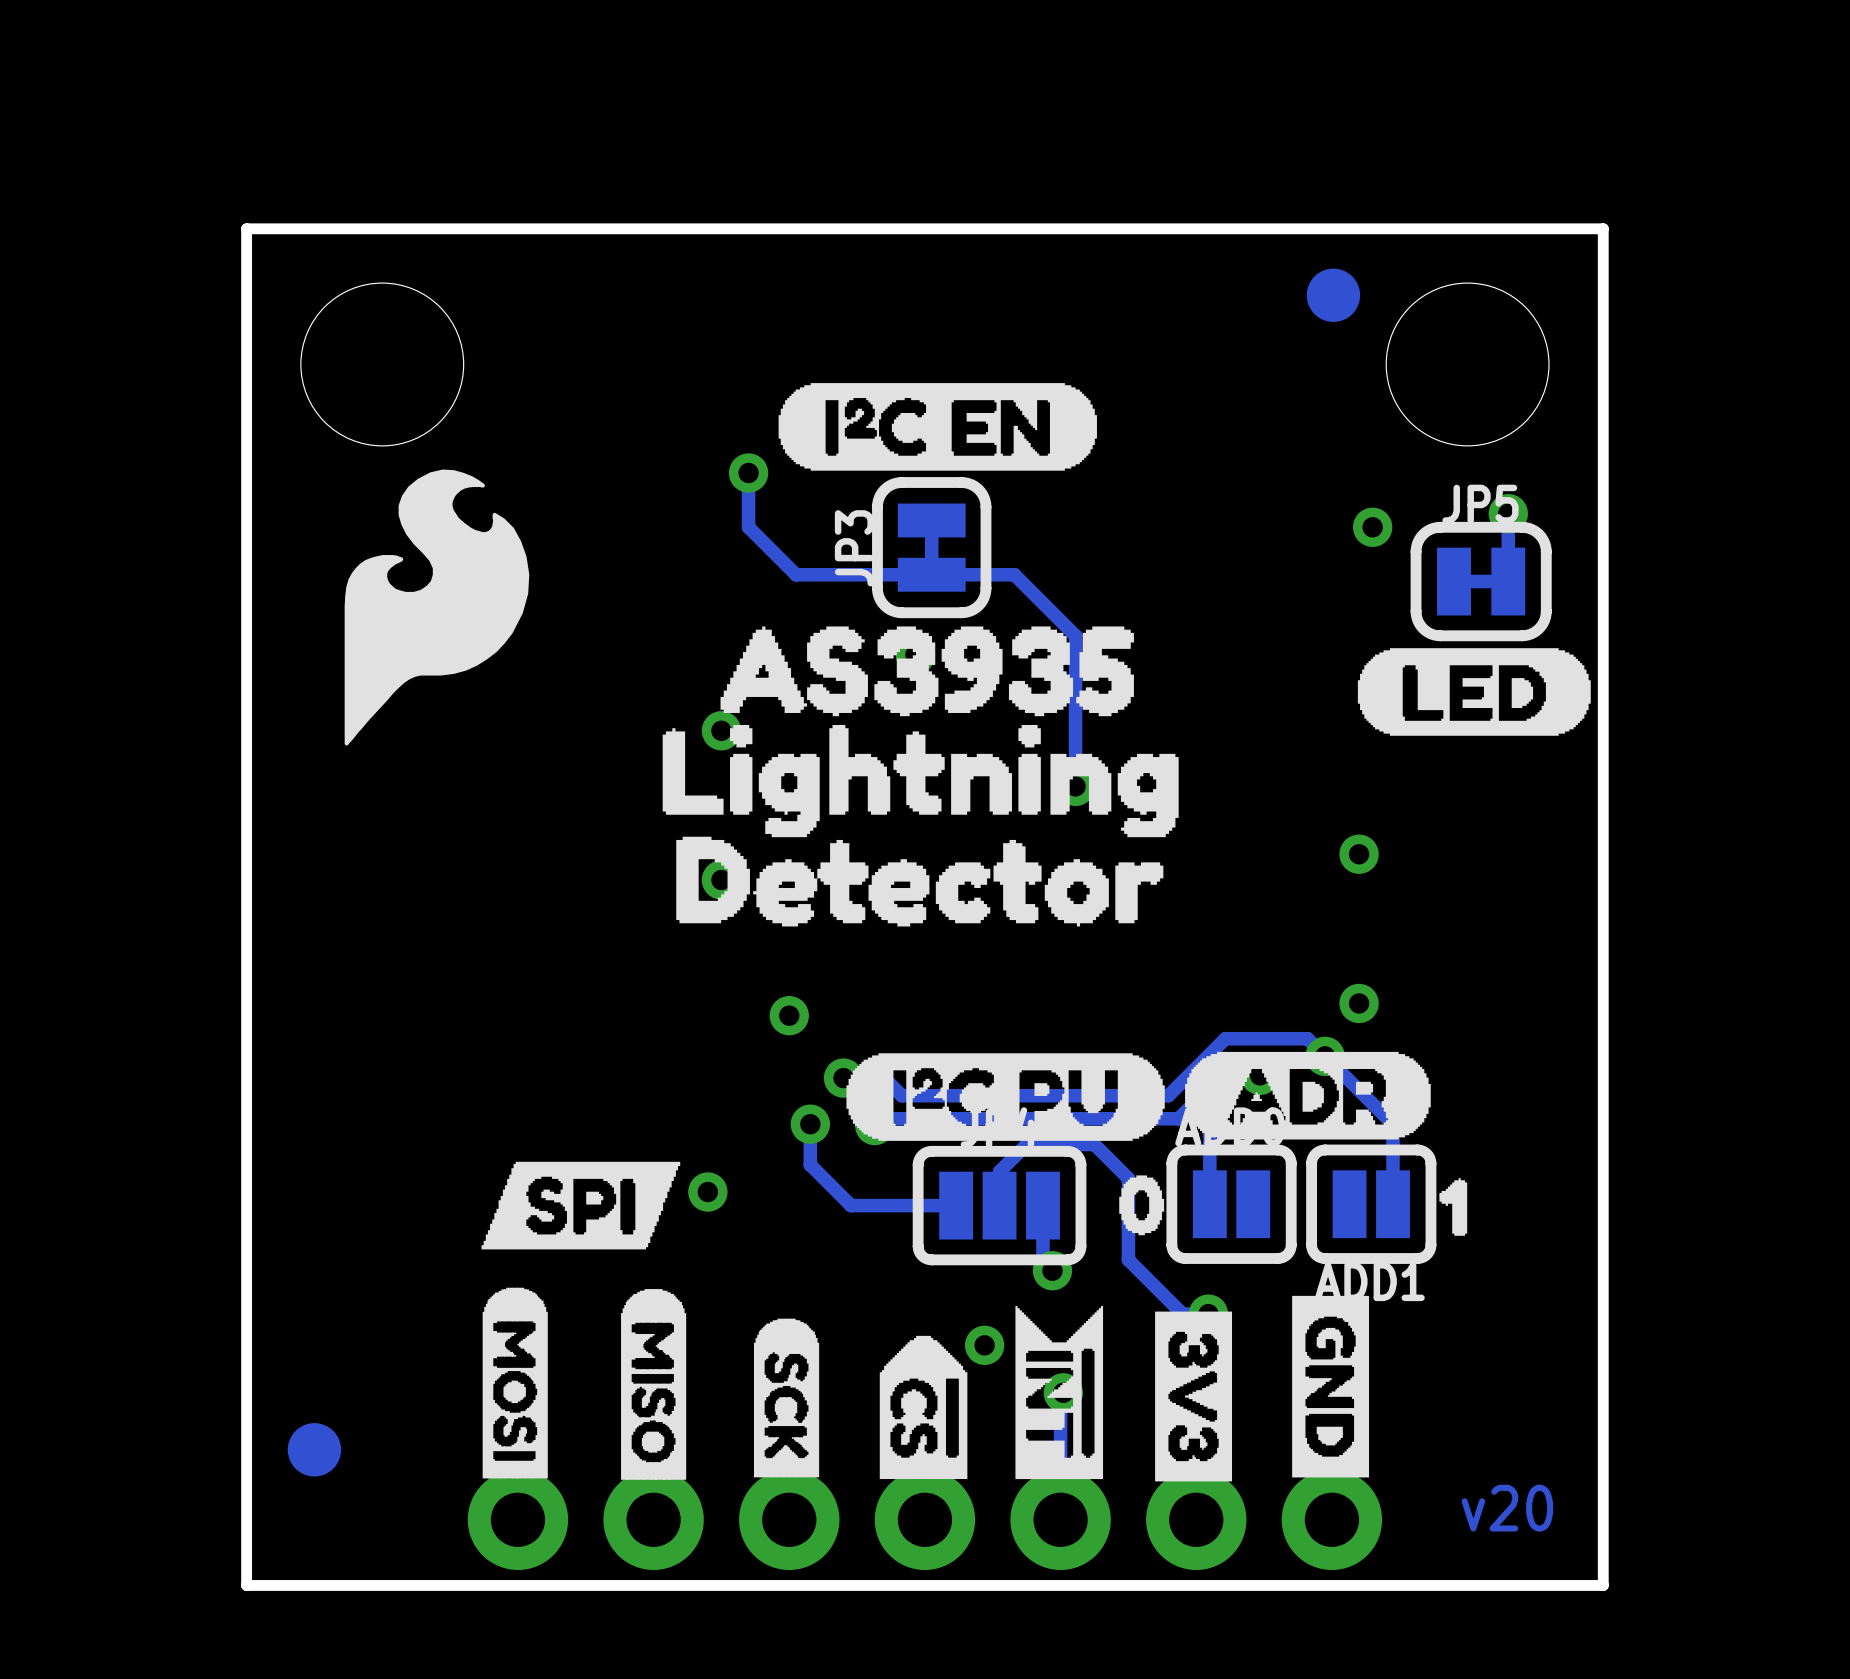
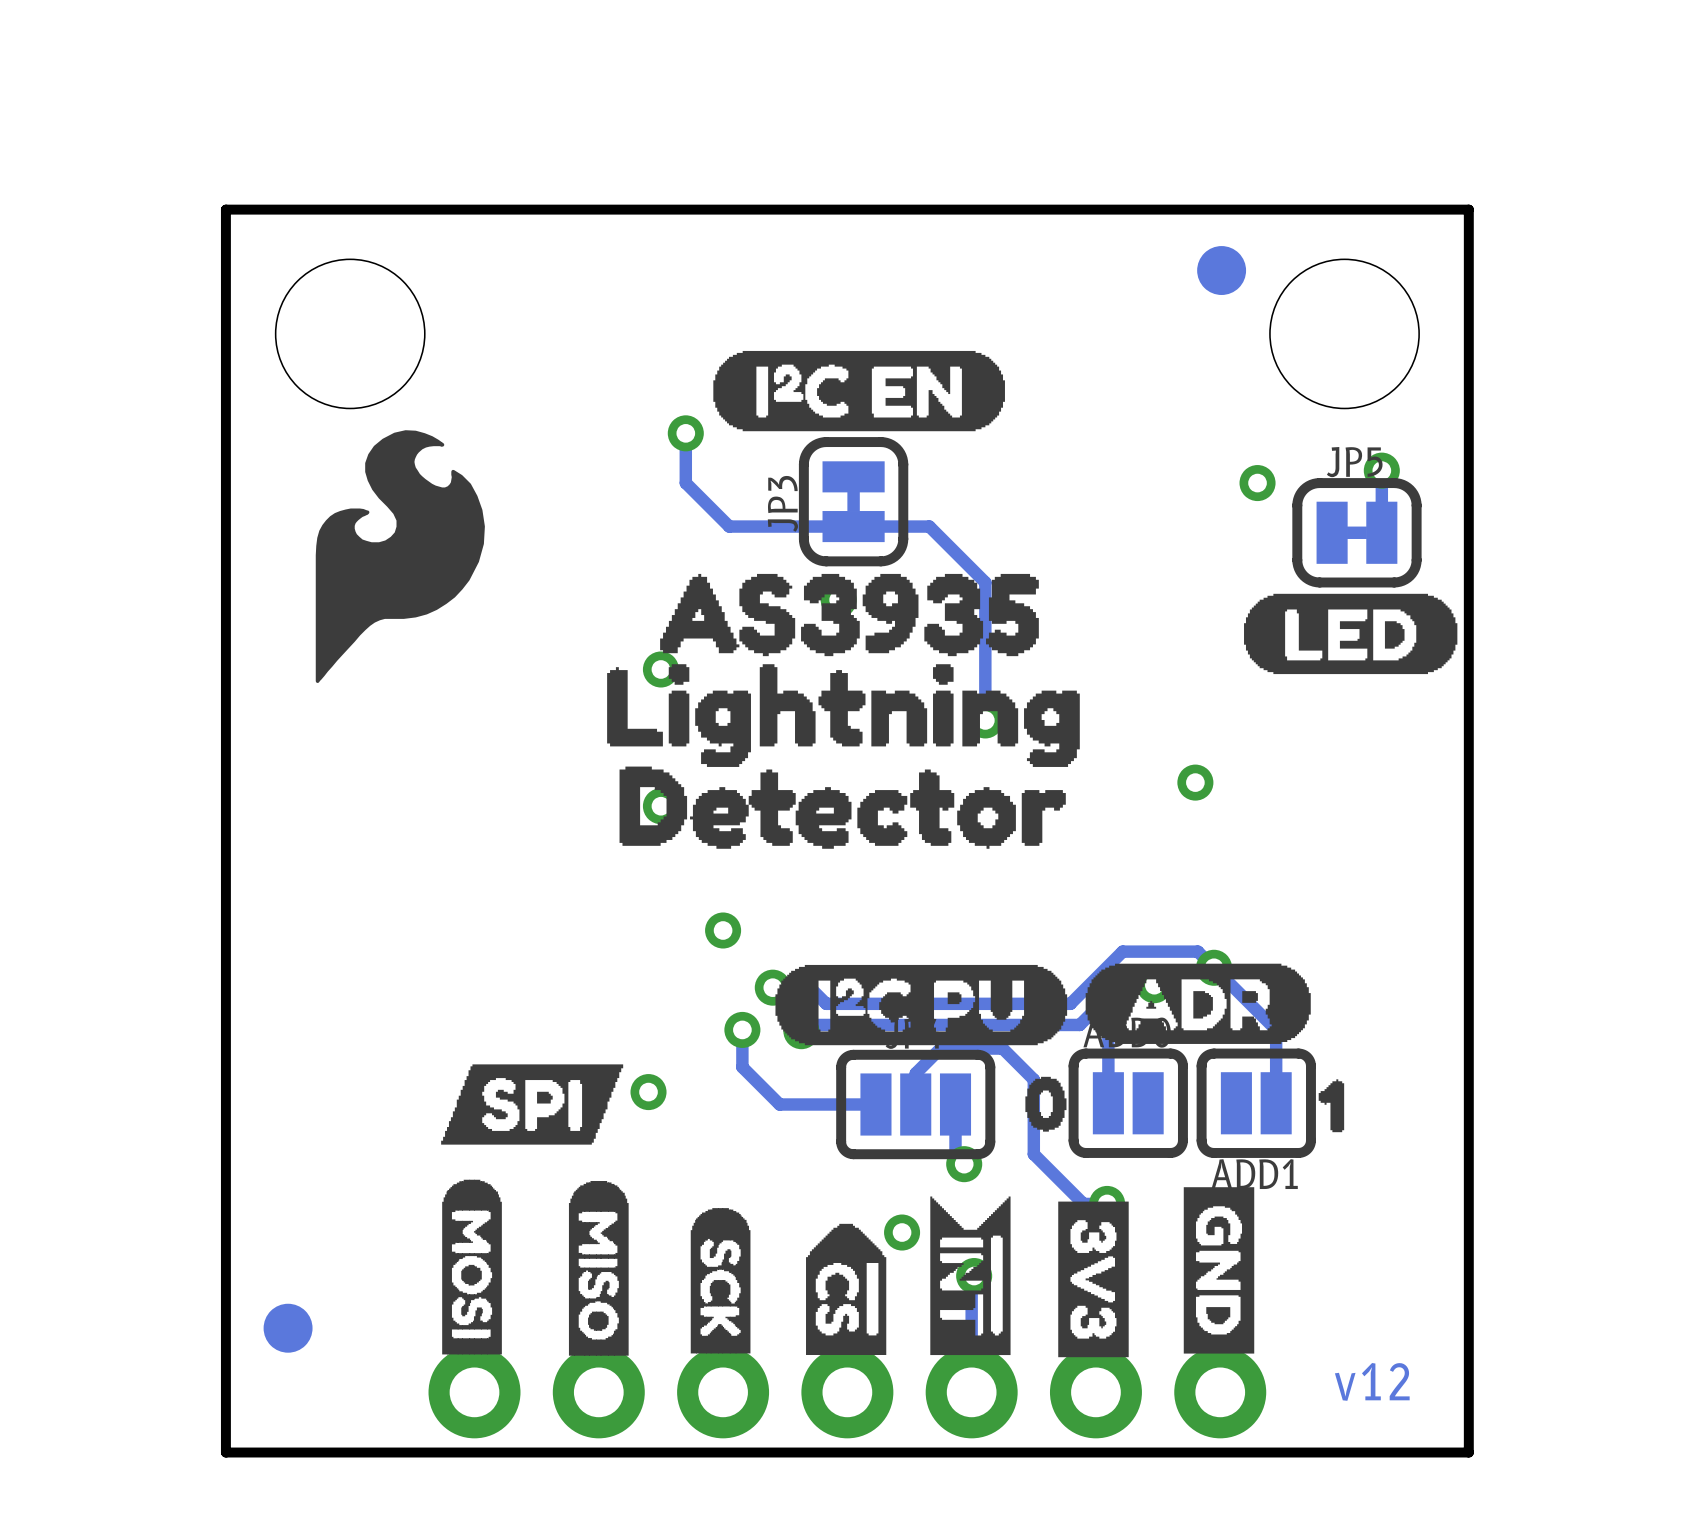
via position: (1359, 854) -> (1195, 782)
via: (1359, 1003) -> none
text: v20 (1507, 1508) -> v12 (1372, 1381)

